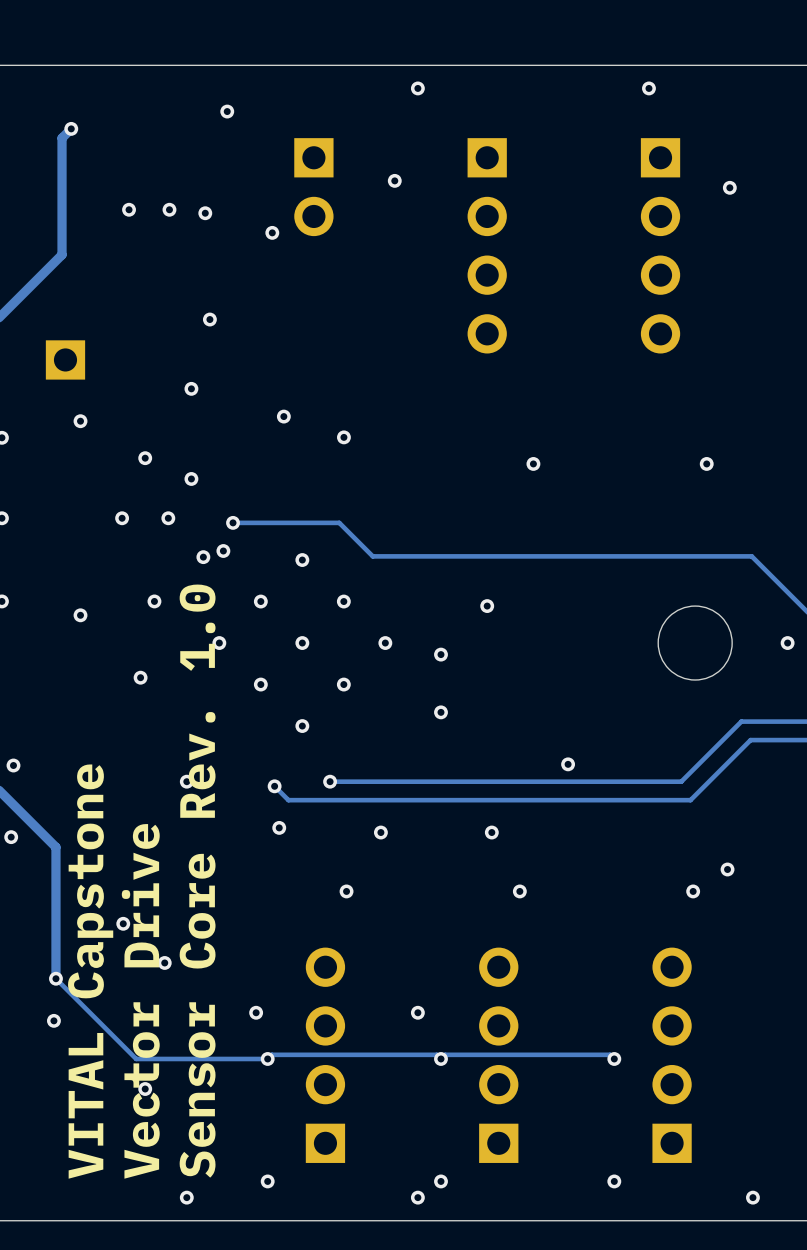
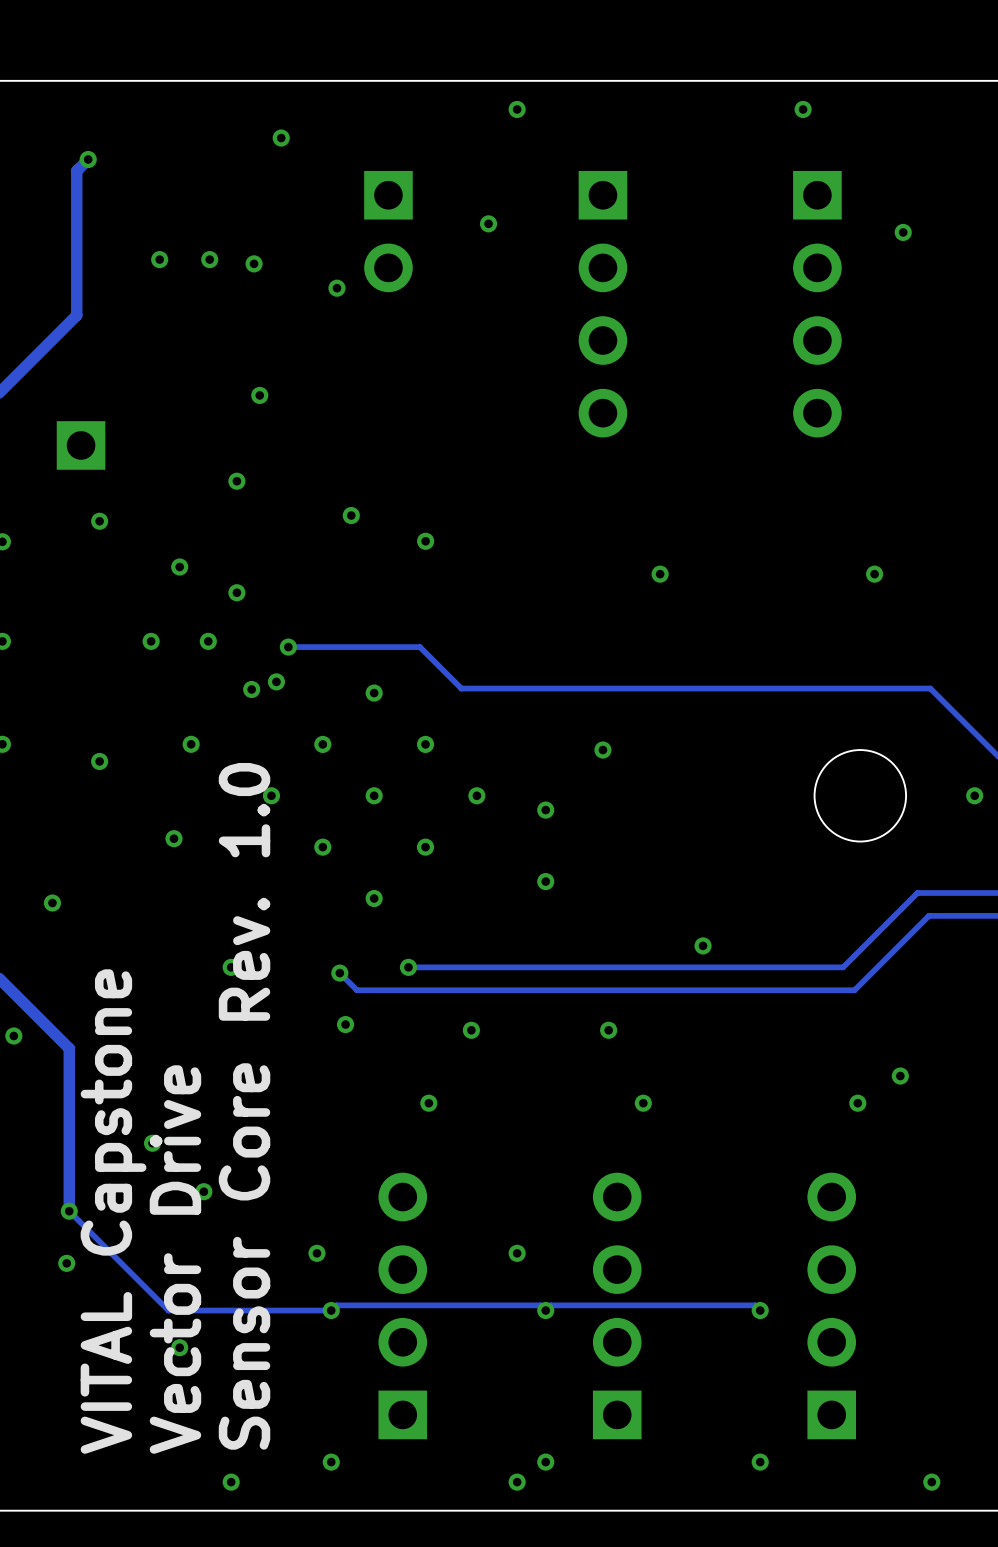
via: none -> (52, 903)
via: (13, 765) -> none

